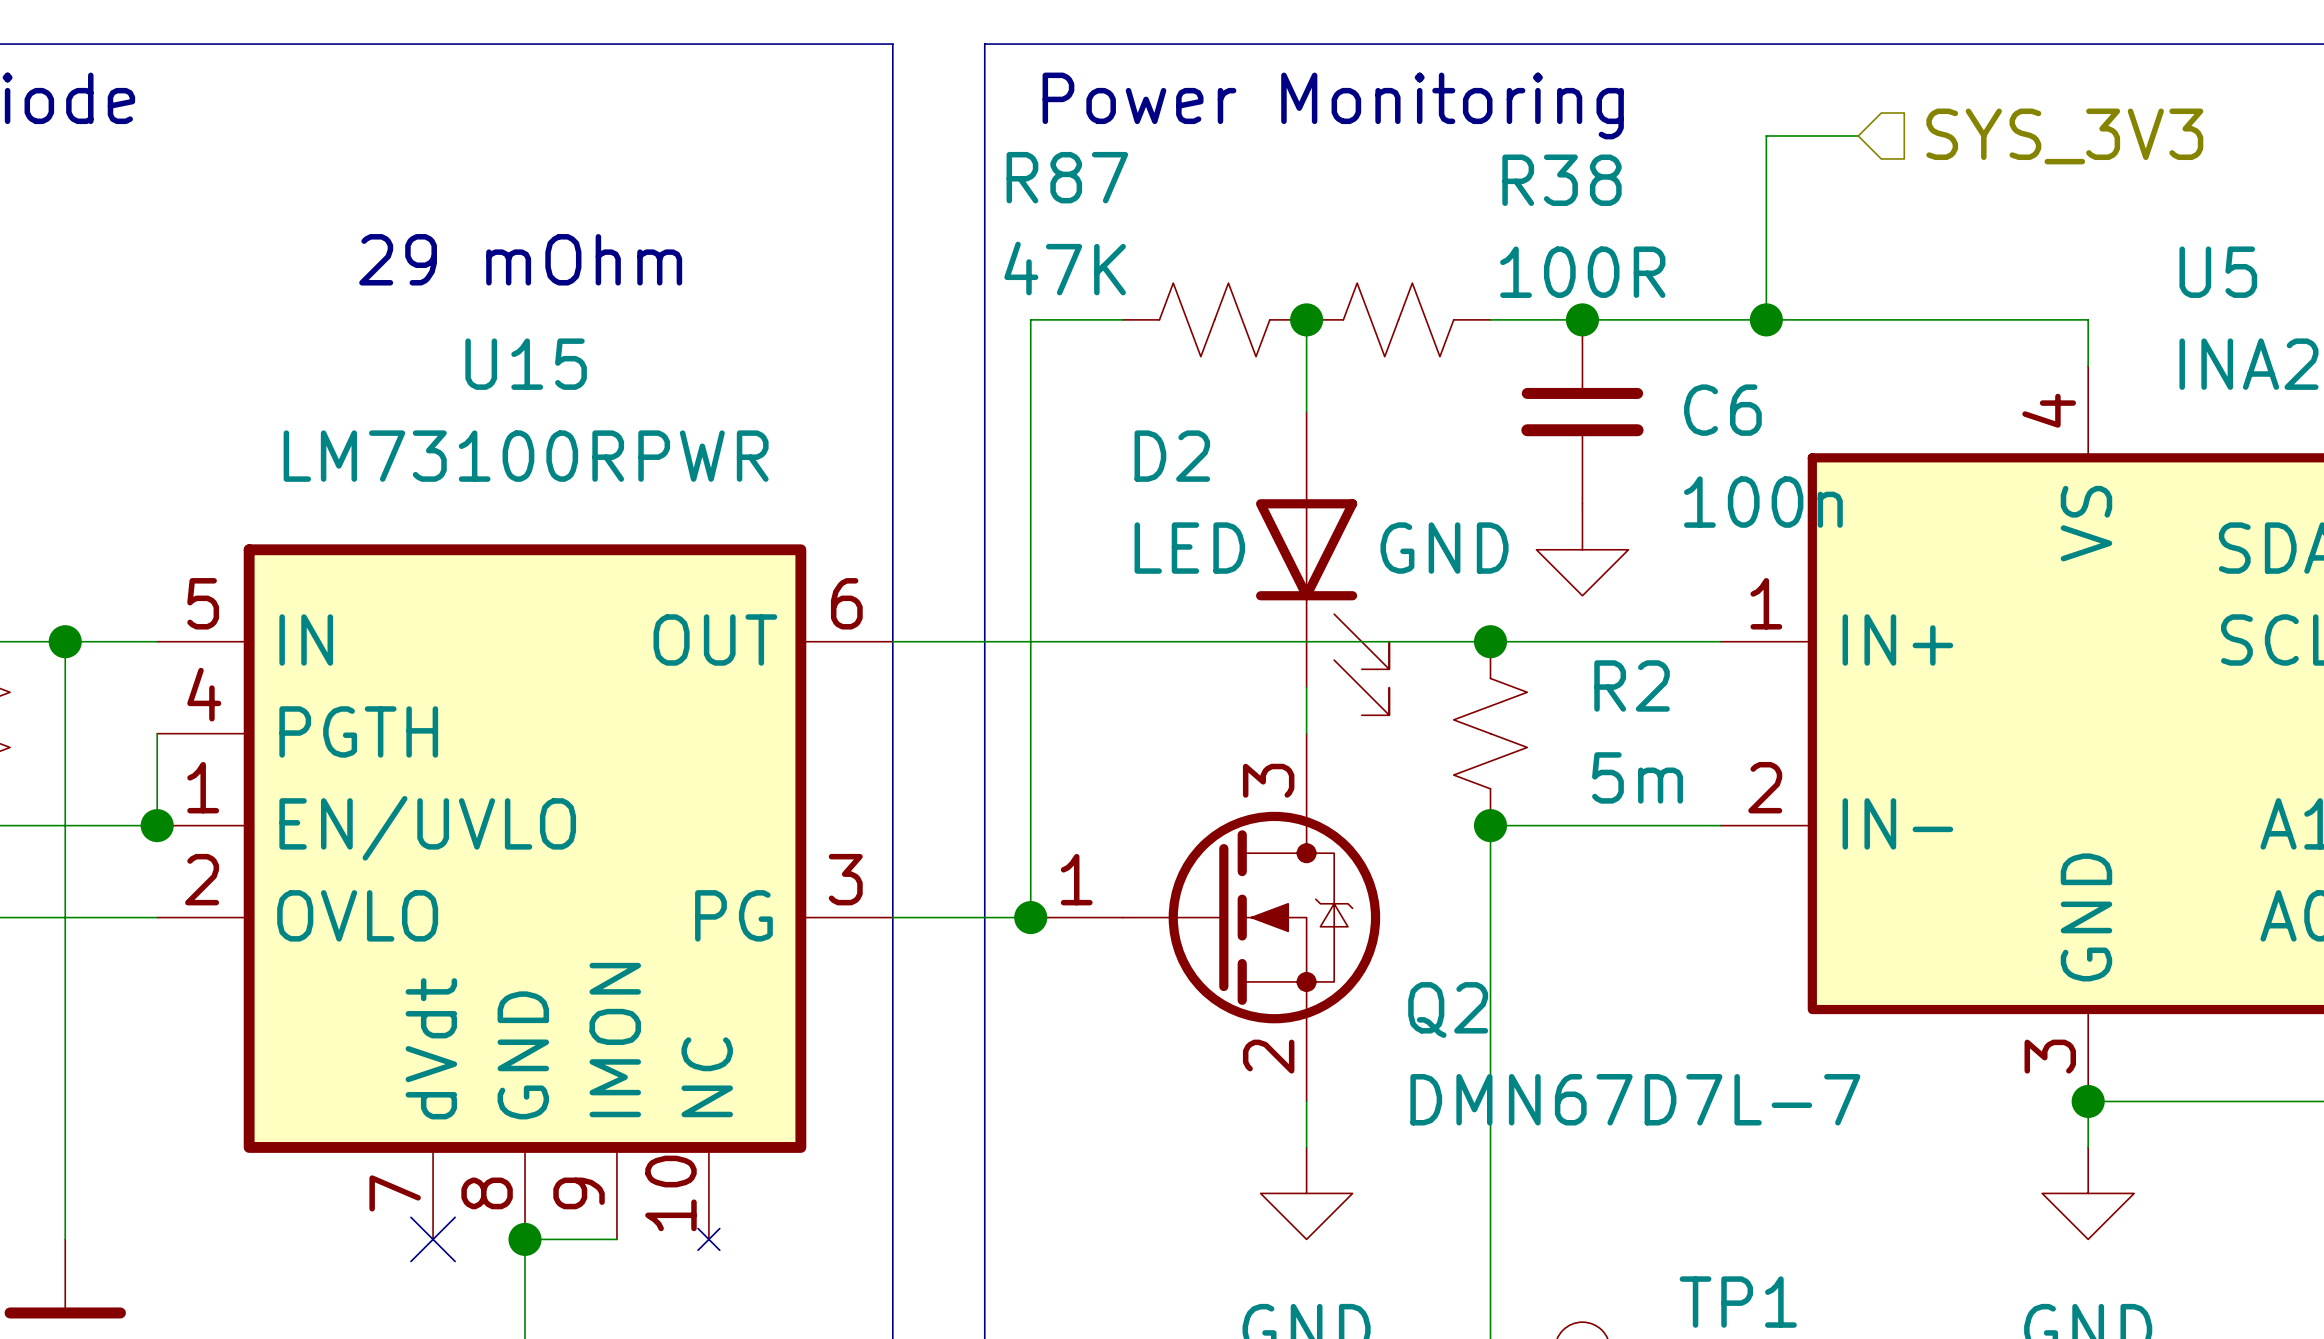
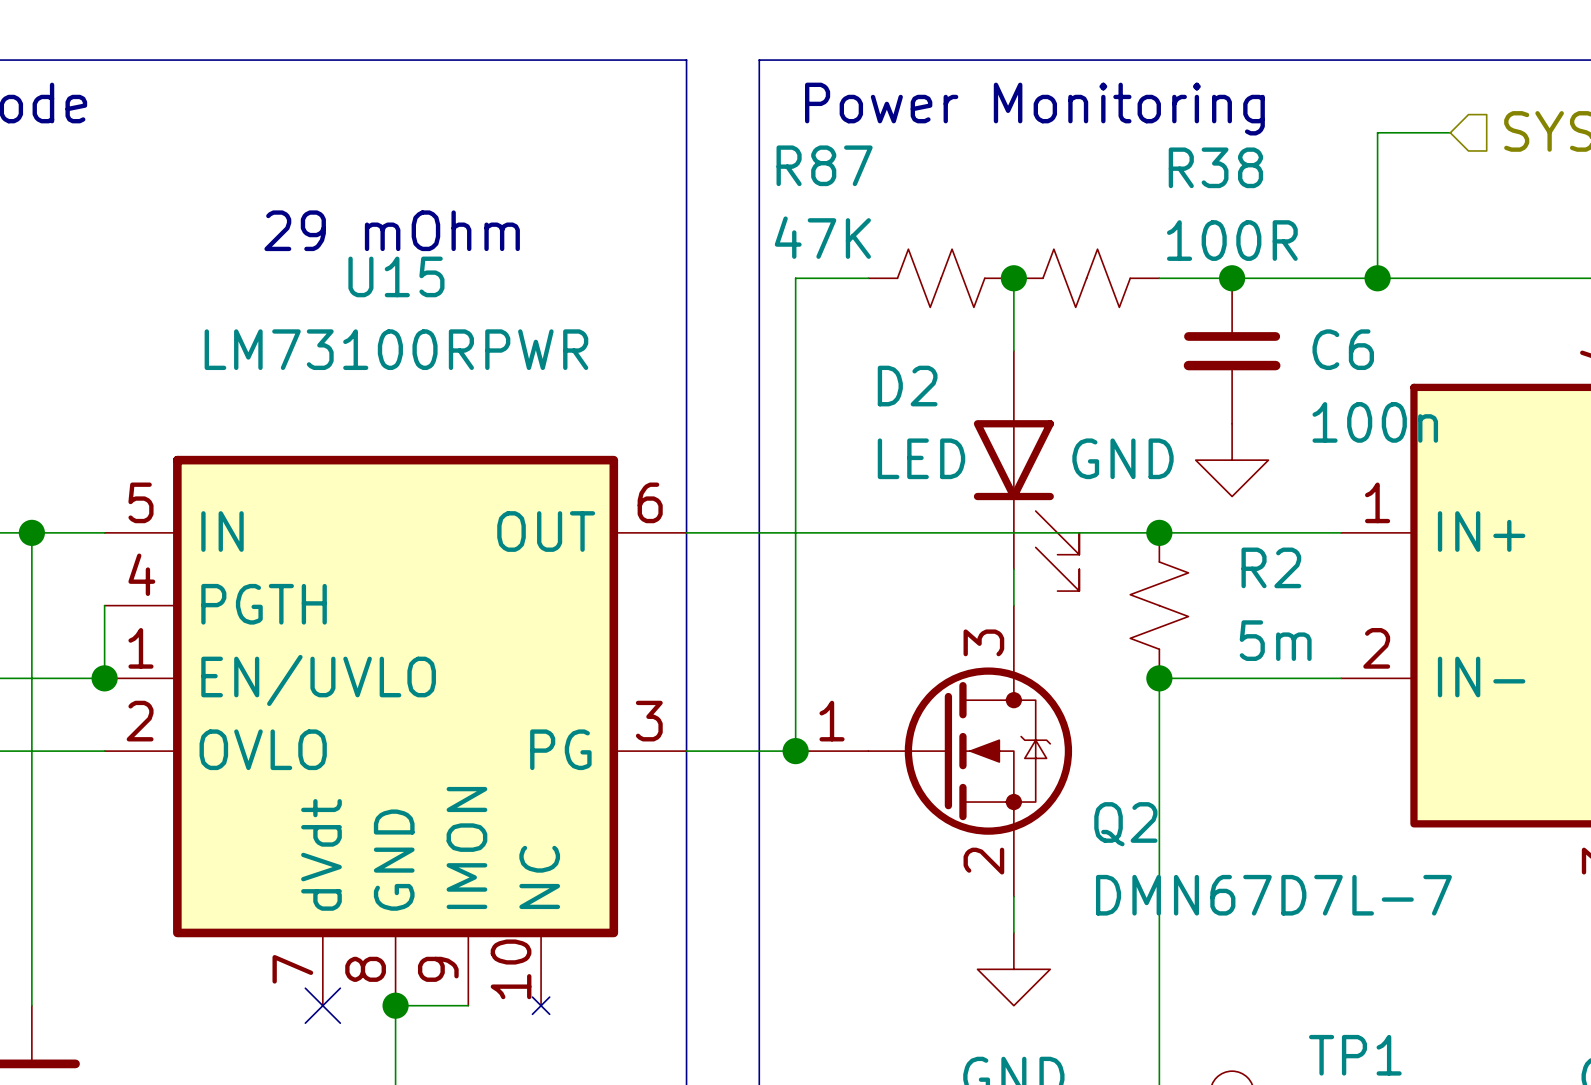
U15 name position: U15 (526, 364) -> U15 (396, 276)
U15 value position: LM73100RPWR (526, 456) -> LM73100RPWR (396, 349)

